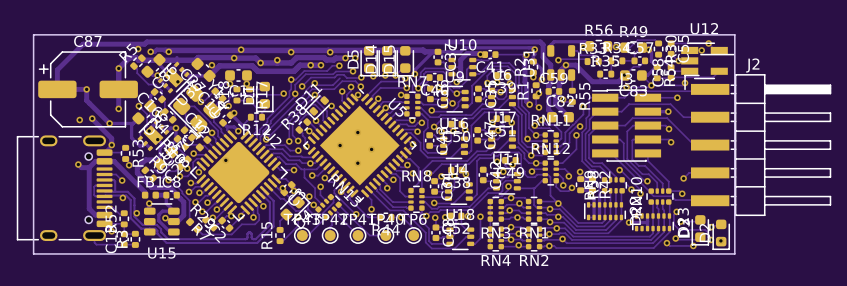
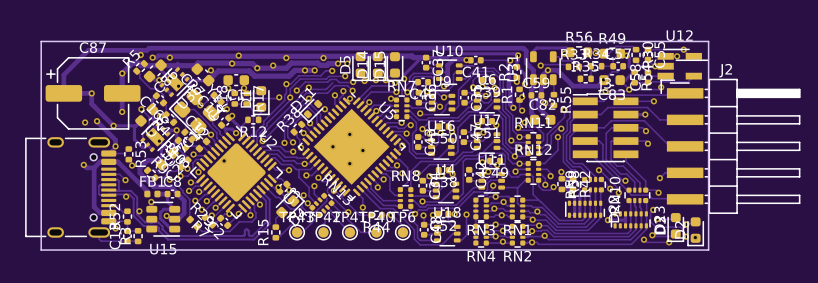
via: (558, 203) -> none
via: (550, 209) -> none
via: none -> (537, 211)
via: (558, 216) -> none

